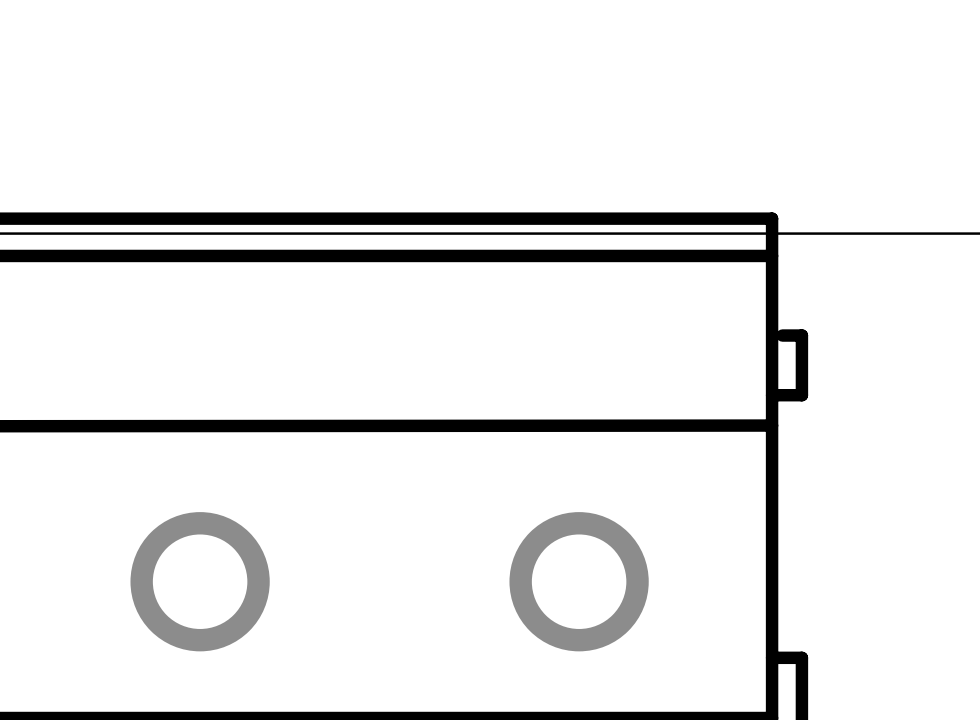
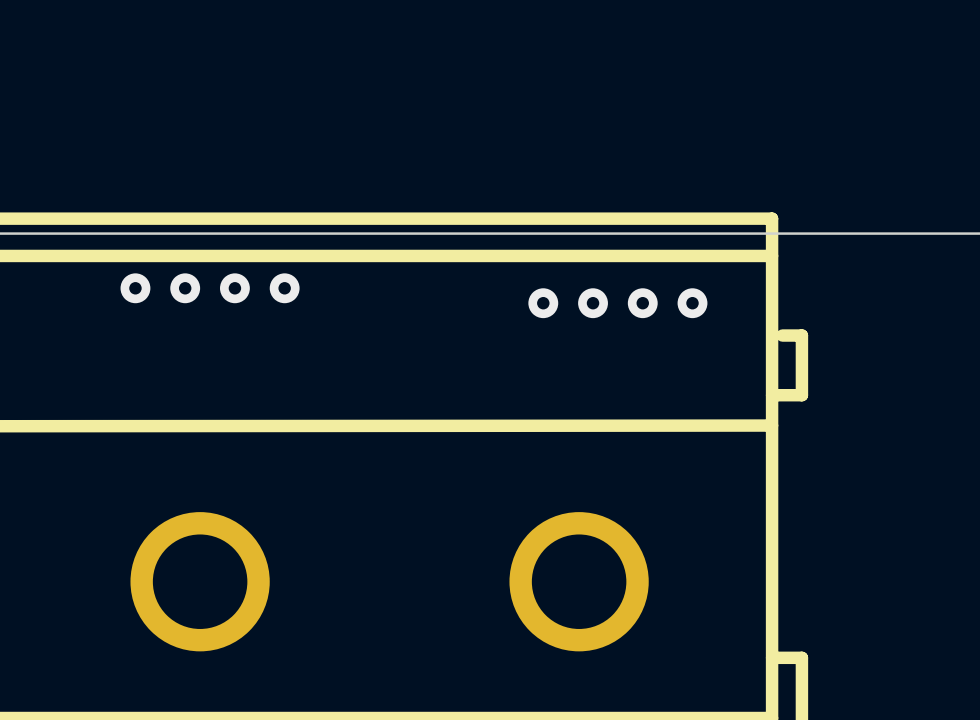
via: none -> (135, 288)
via: none -> (185, 288)
via: none -> (234, 288)
via: none -> (284, 288)
via: none -> (543, 303)
via: none -> (593, 303)
via: none -> (642, 303)
via: none -> (692, 303)

